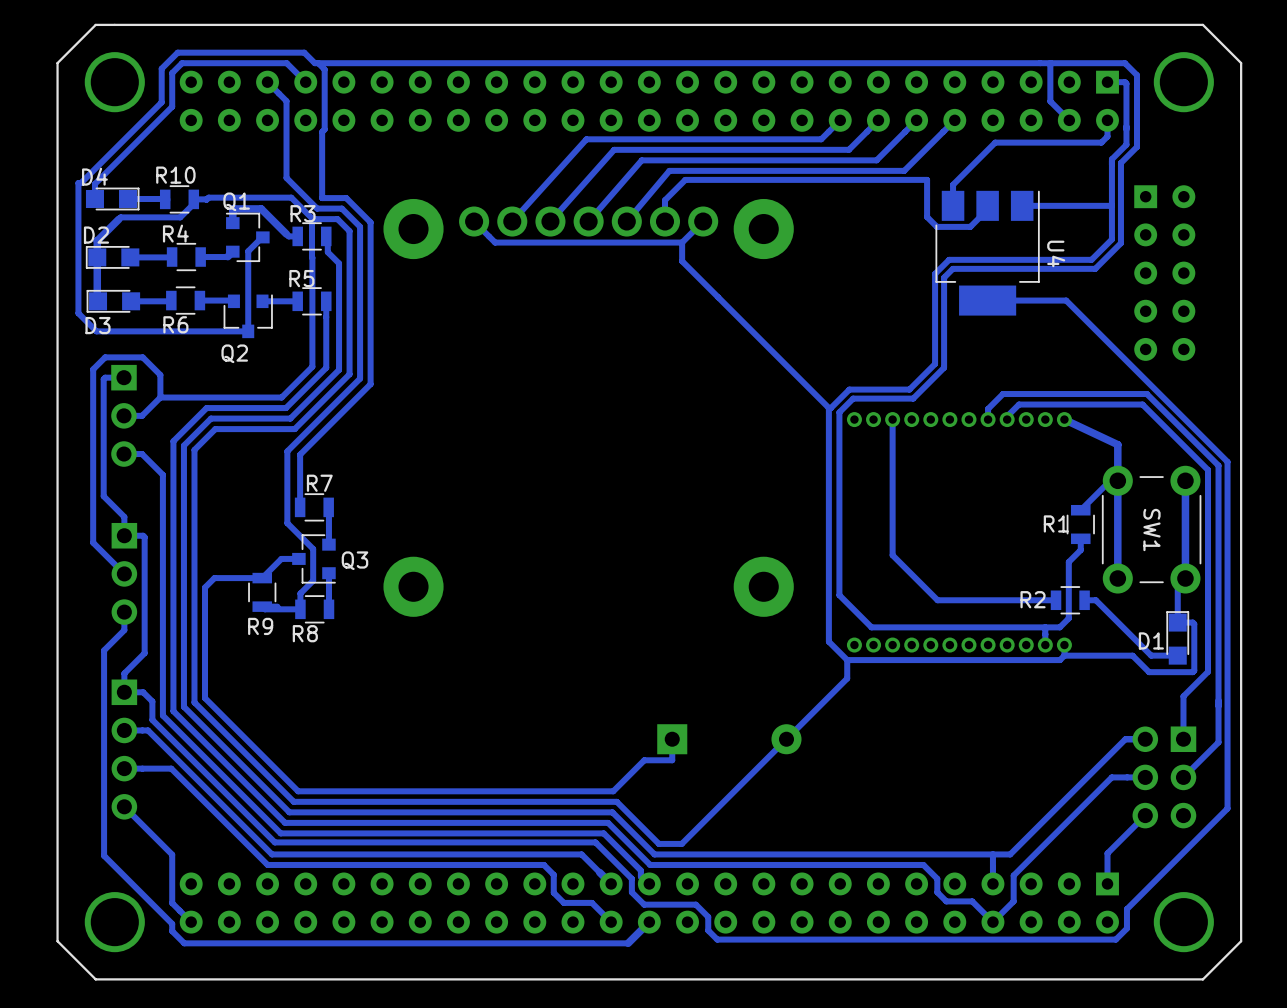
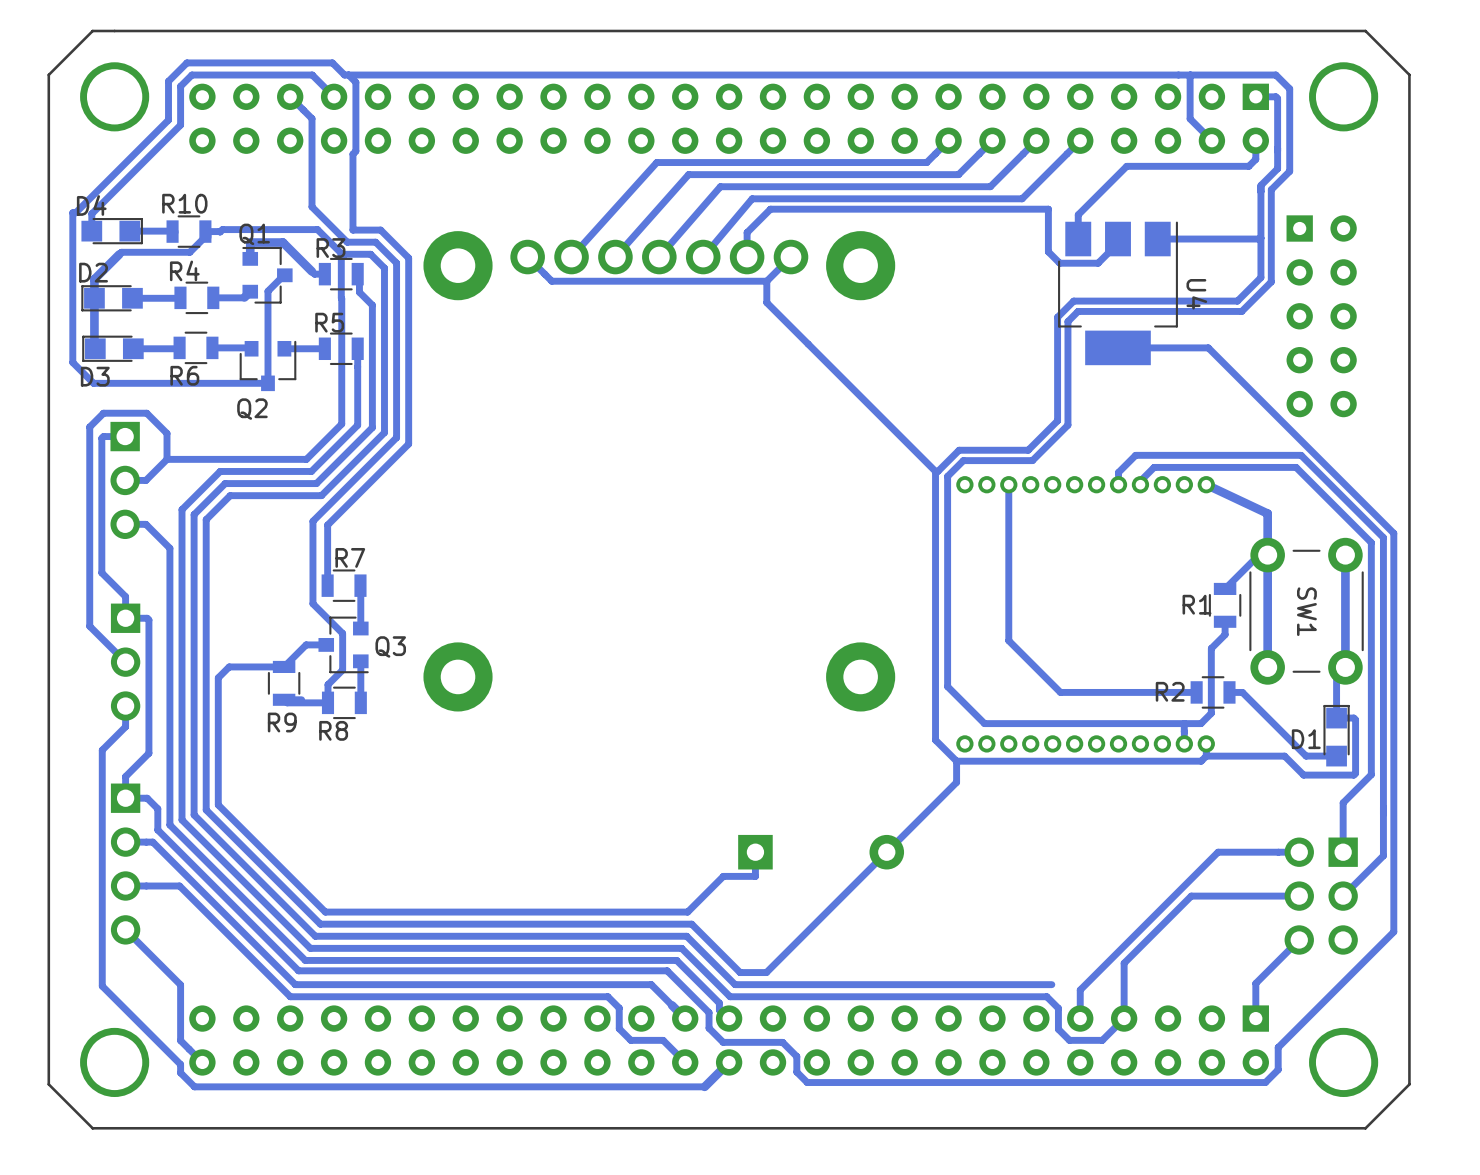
track: (1125, 739) (1010, 854) (930, 854) -> (1276, 852) (1218, 852) (1080, 990) (1080, 1018)
track: (1111, 777) (1013, 875) (1013, 901) (992, 922) (972, 901) (946, 901) (937, 892) (937, 878) (923, 864) -> (1260, 896) (1191, 896) (1124, 963) (1124, 984)
track: none -> (1044, 996) (1046, 996) (1058, 1008) (1058, 1029) (1069, 1040) (1102, 1040) (1124, 1018)

